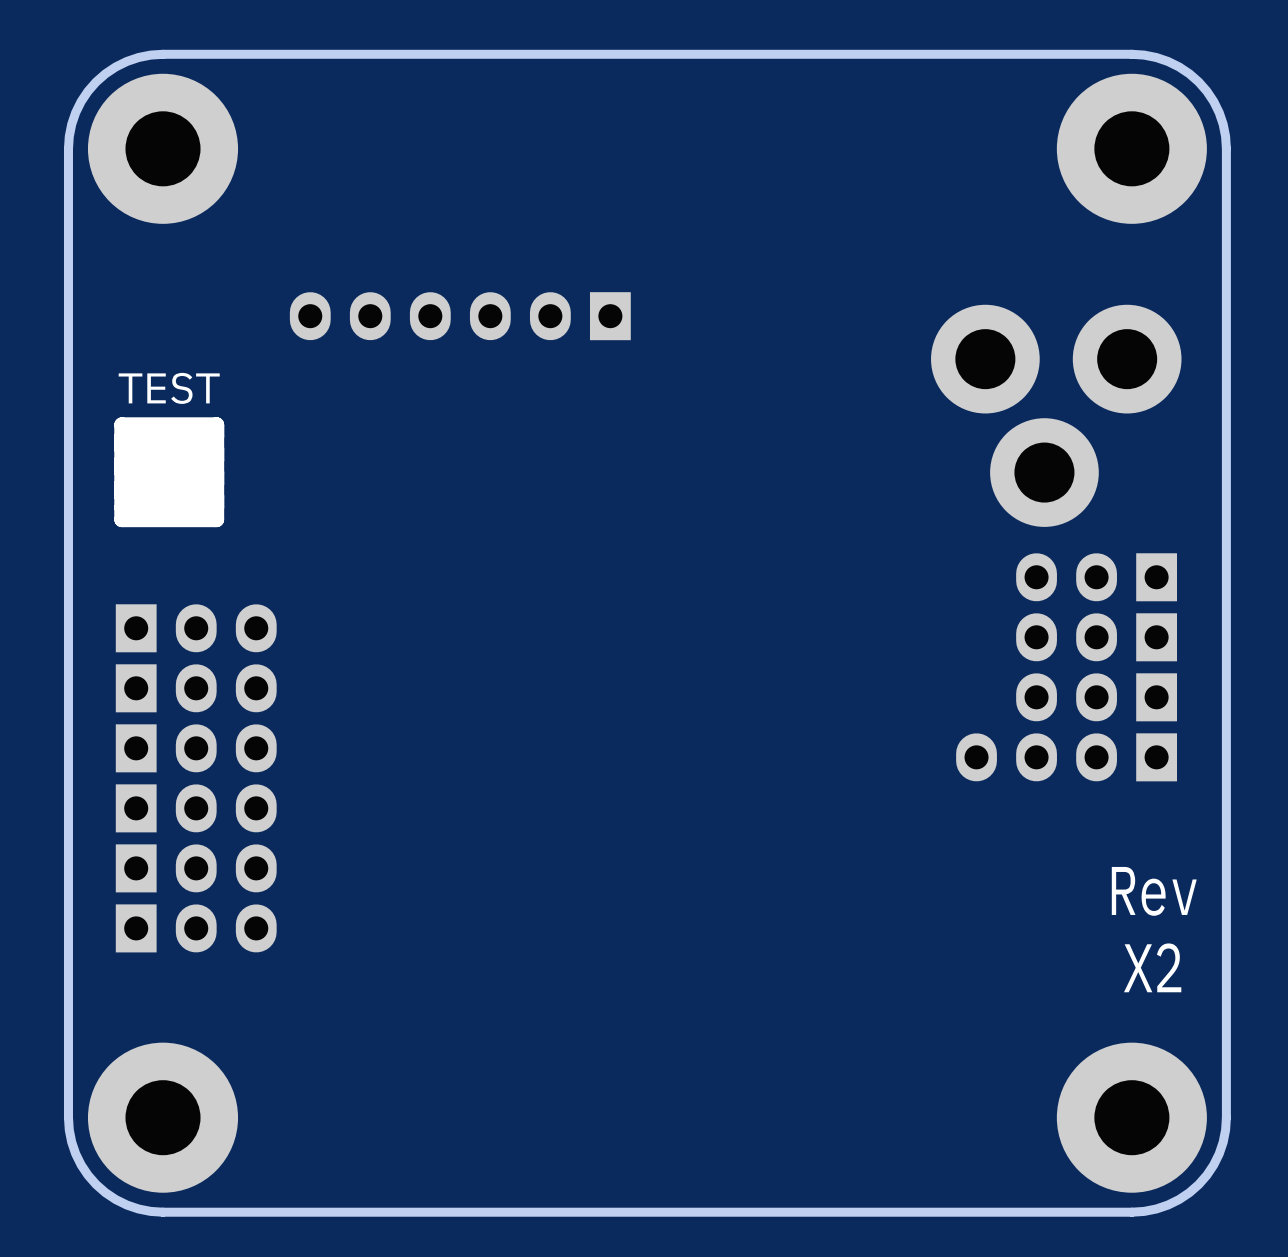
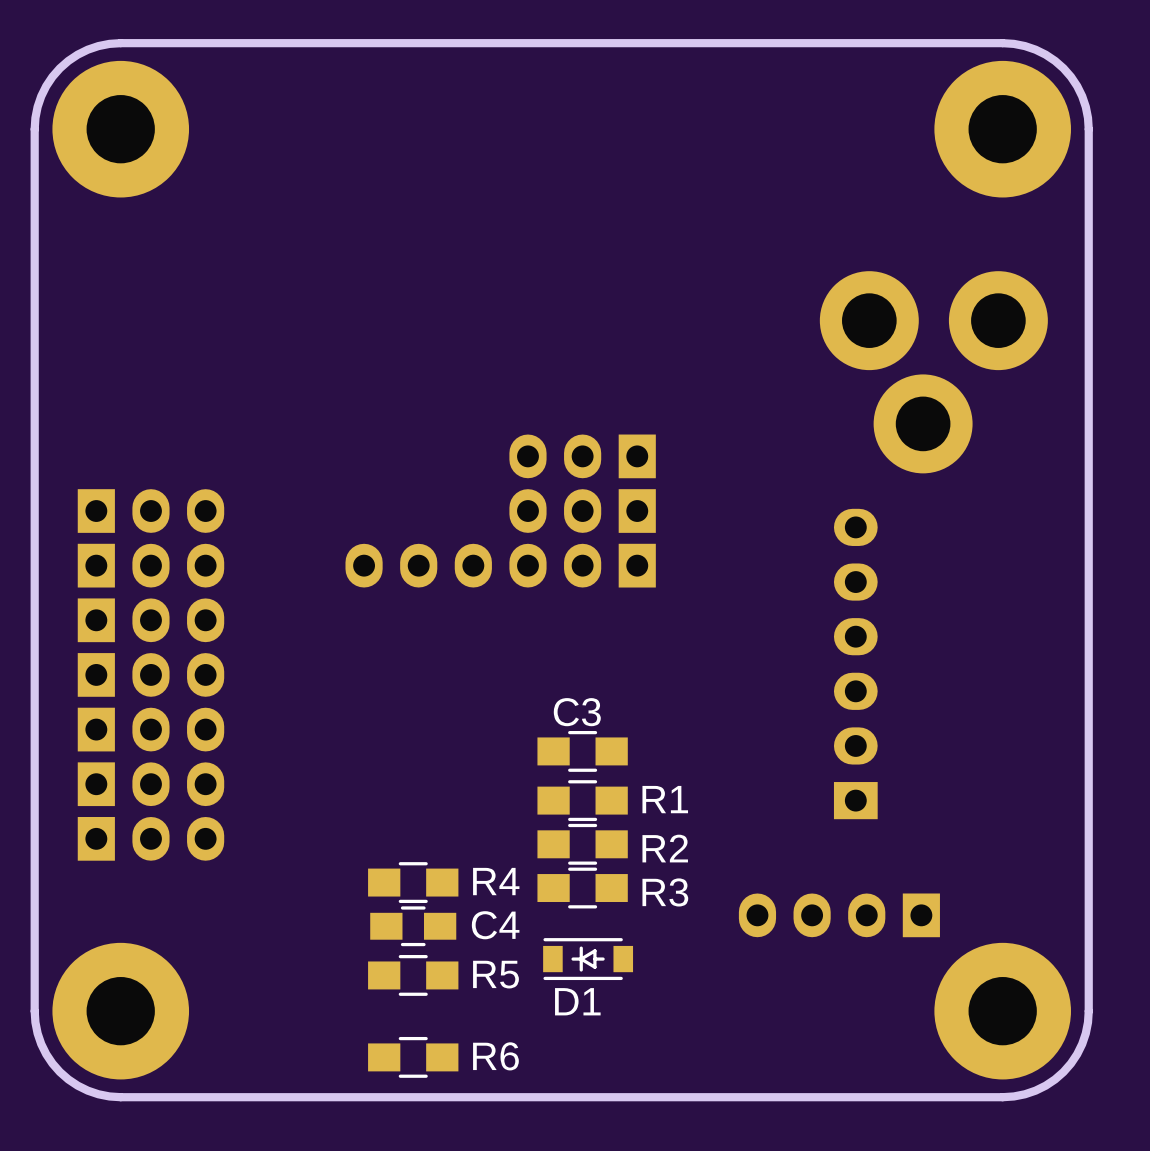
part: (460, 316) -> none
TEST: (169, 472) -> none
part: none -> (582, 456)
part: none -> (150, 511)
part: none -> (582, 511)
part: (1096, 577) -> none
part: none -> (500, 565)
part: (1096, 637) -> none
part: (1096, 697) -> none
part: none -> (855, 664)
part position: (1066, 757) -> (839, 915)
C3: none -> (582, 751)
R1: none -> (582, 800)
text: Rev (1154, 891) -> none
R2: none -> (582, 844)
text: X2 (1152, 967) -> none
R4: none -> (413, 882)
R3: none -> (582, 888)
C4: none -> (413, 926)
D1: none -> (588, 959)
R5: none -> (413, 975)
R6: none -> (413, 1057)

